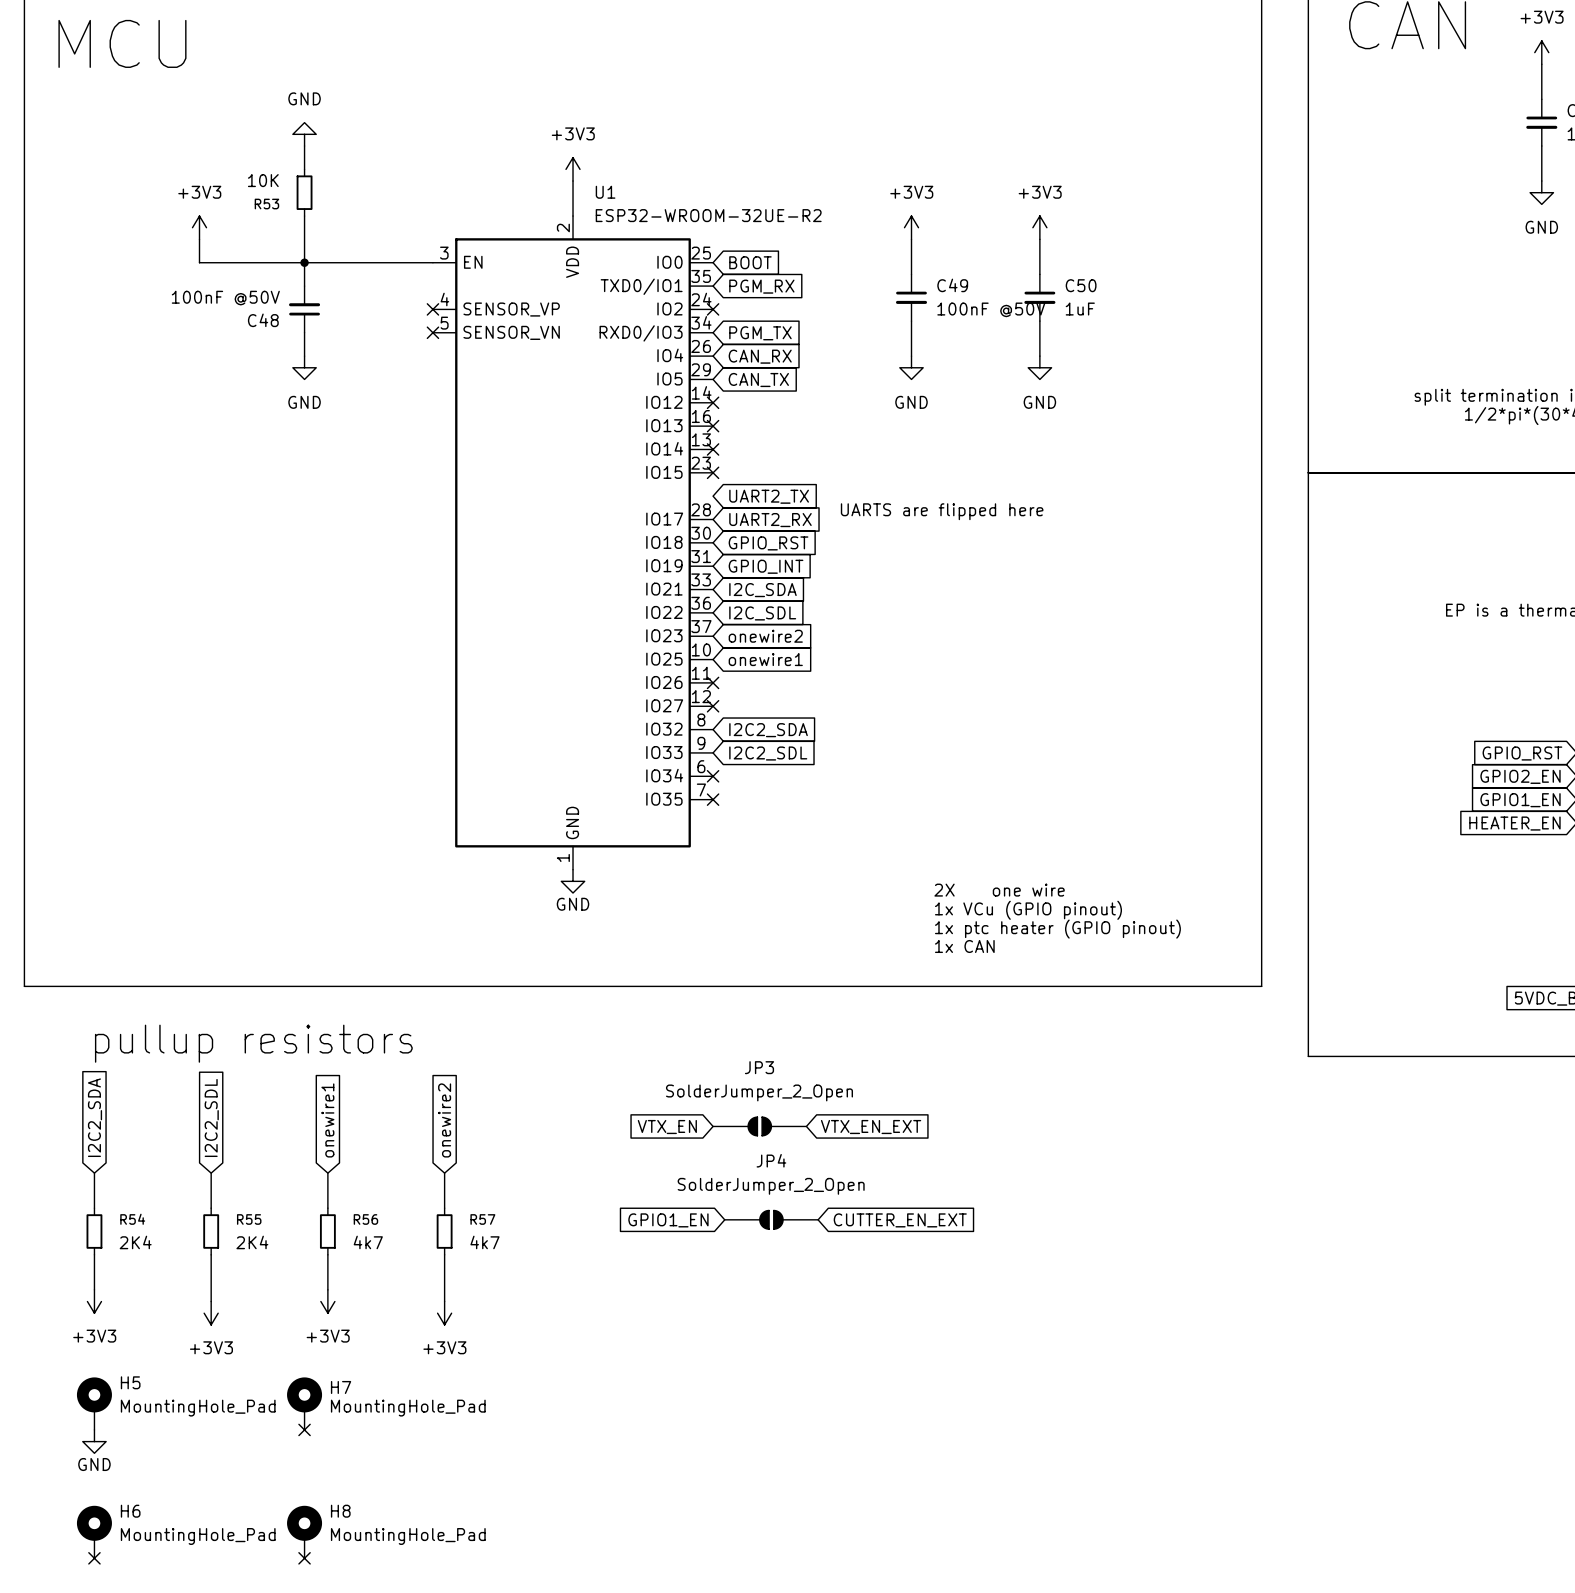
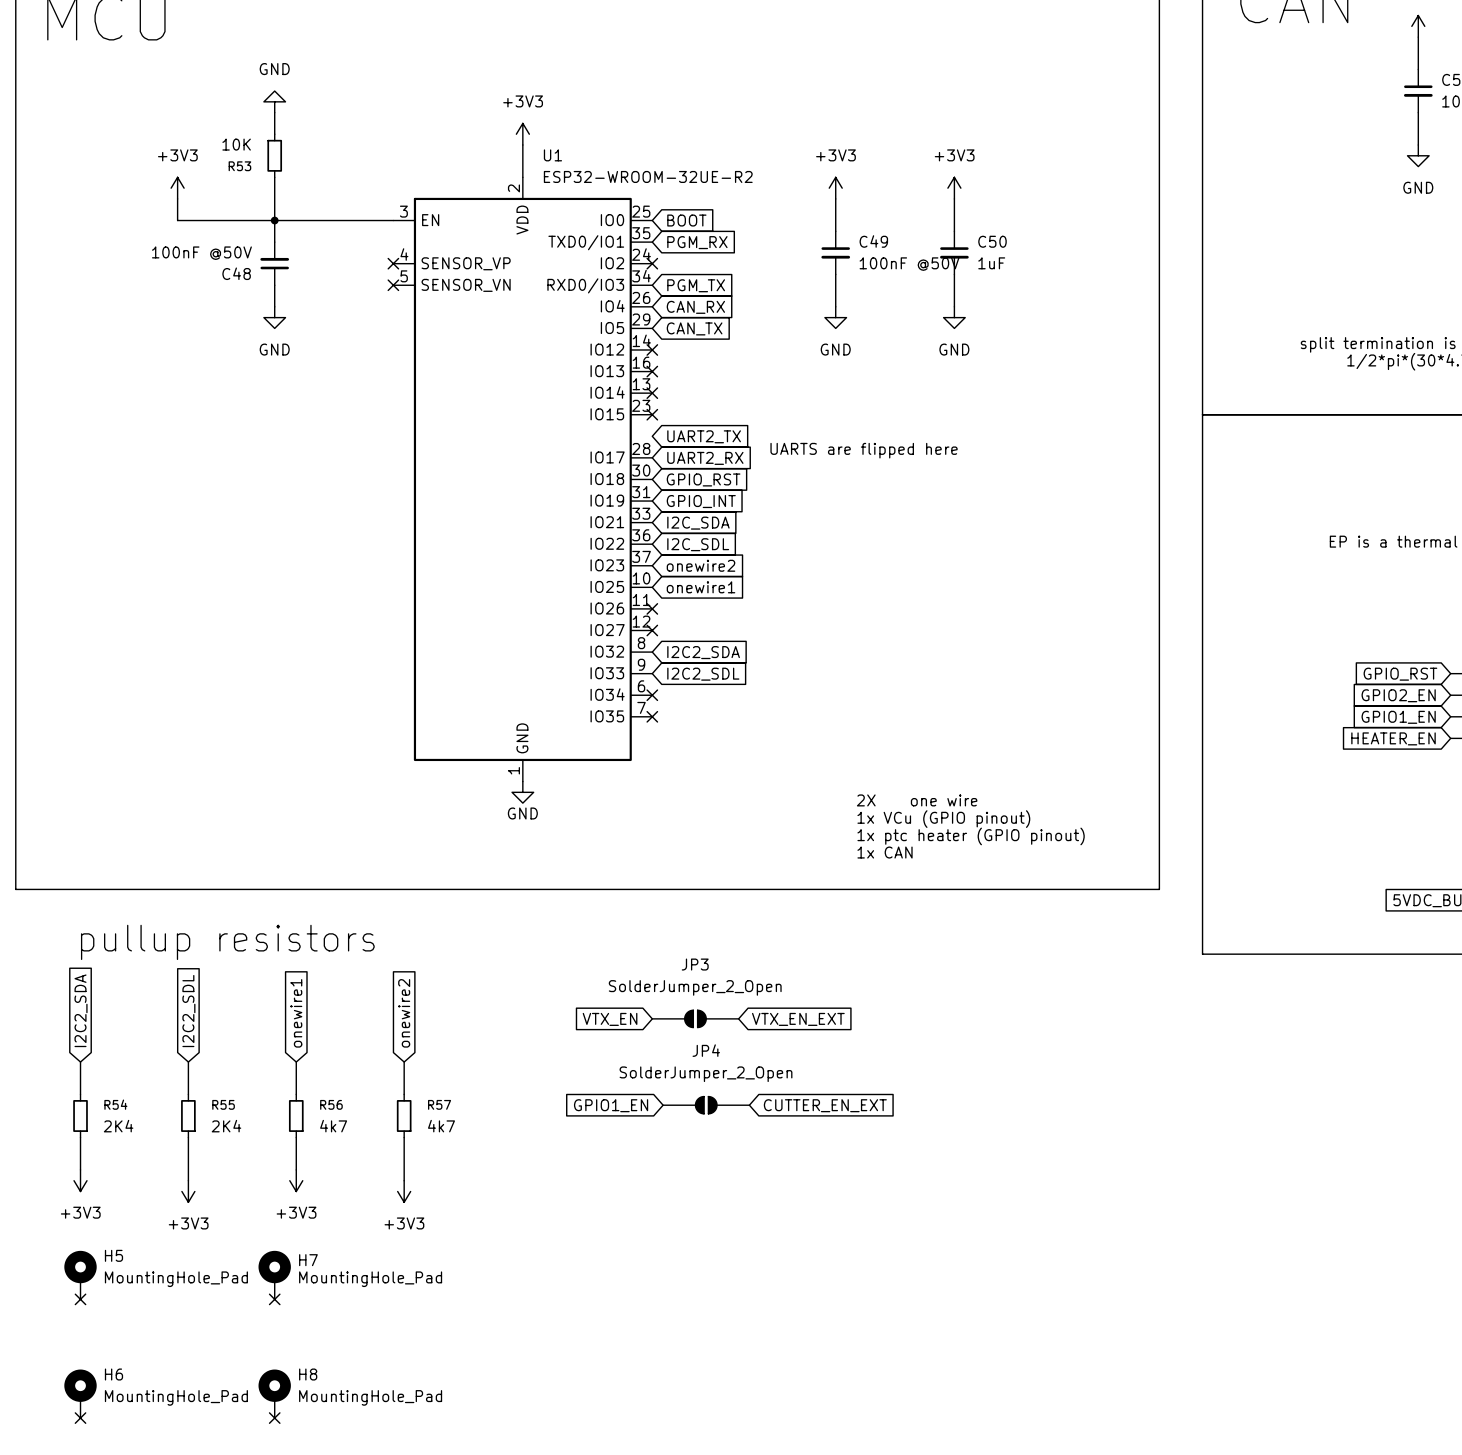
no-connect mark: none -> (80, 1299)
power symbol: GND (94, 1441) -> none

